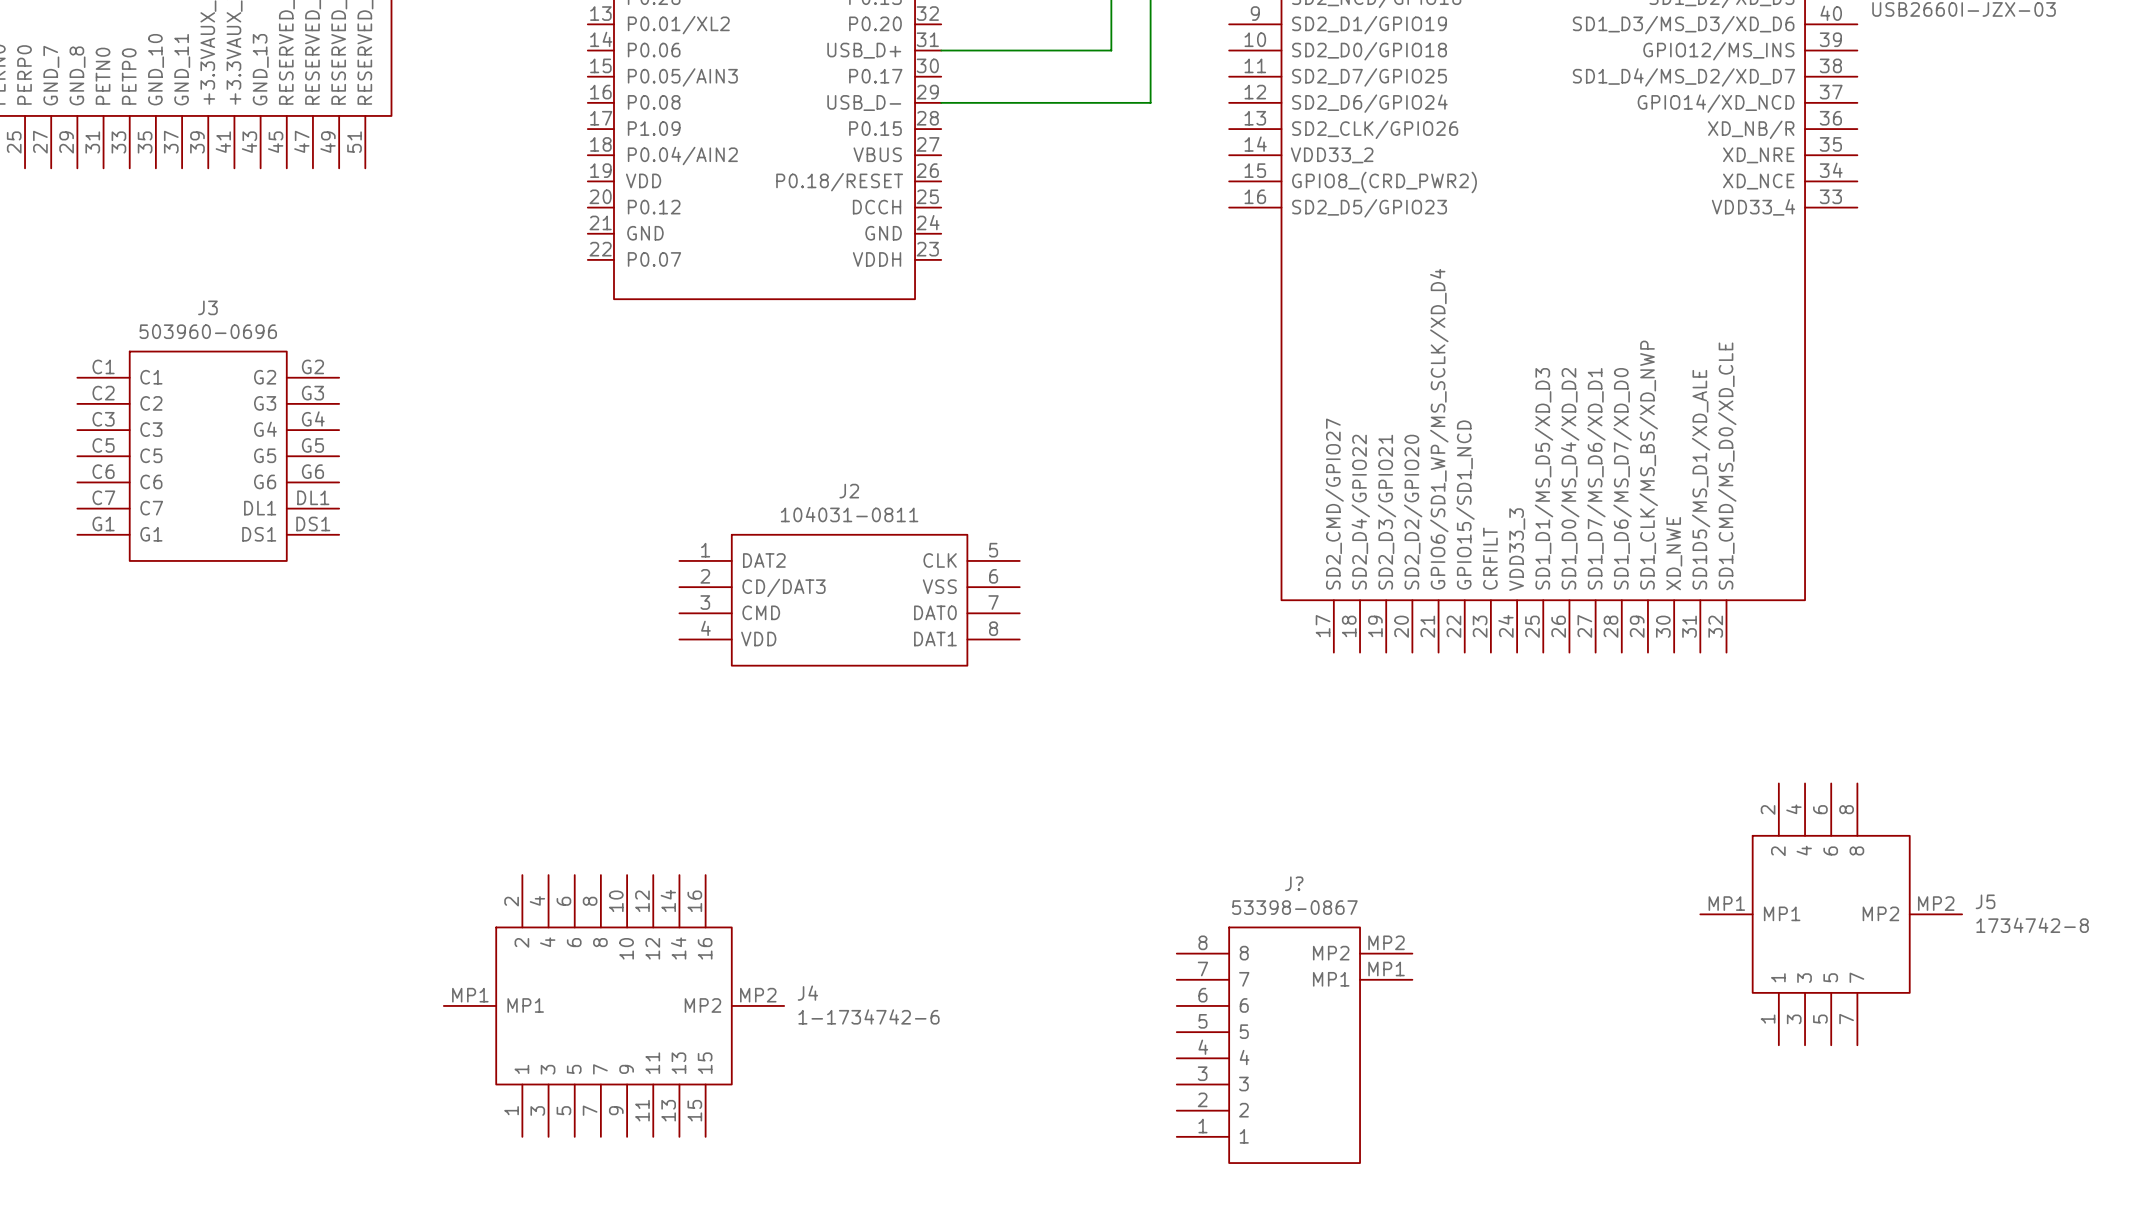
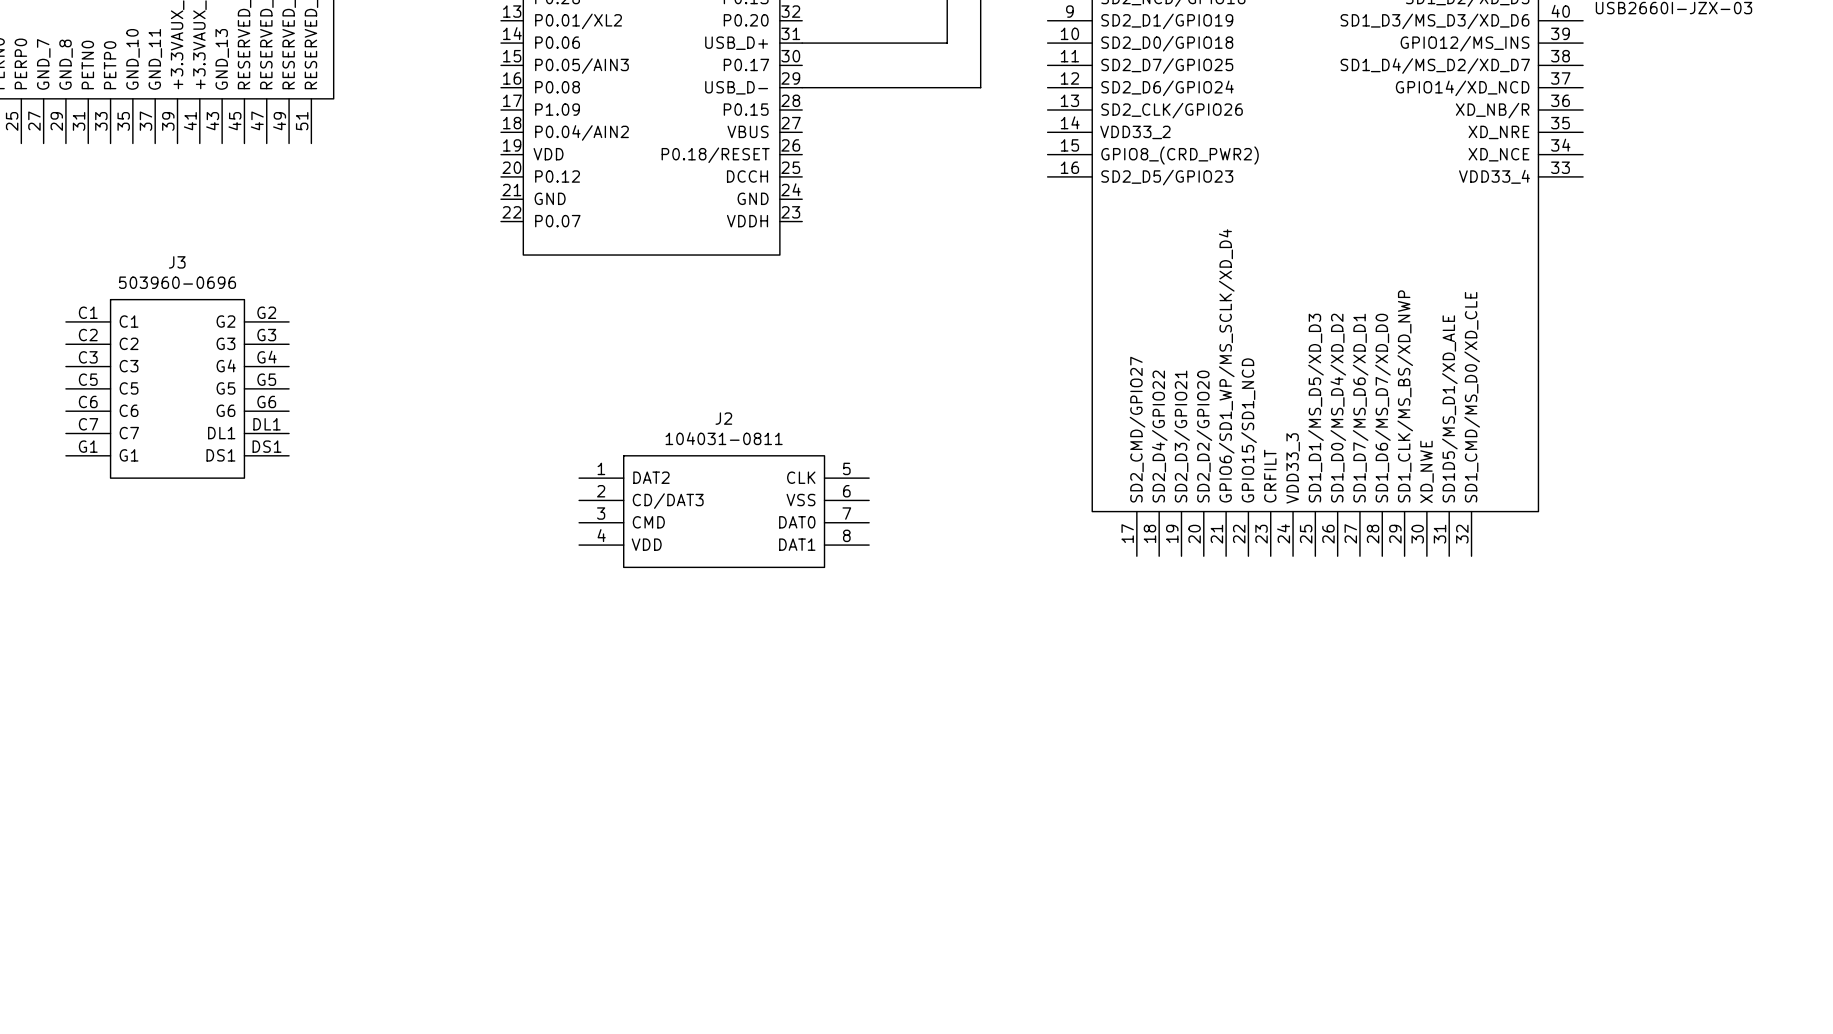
J5: 1734742-8 (1831, 914) -> none
J4: 1-1734742-6 (613, 1005) -> none
J?: 53398-0867 (1294, 1045) -> none

